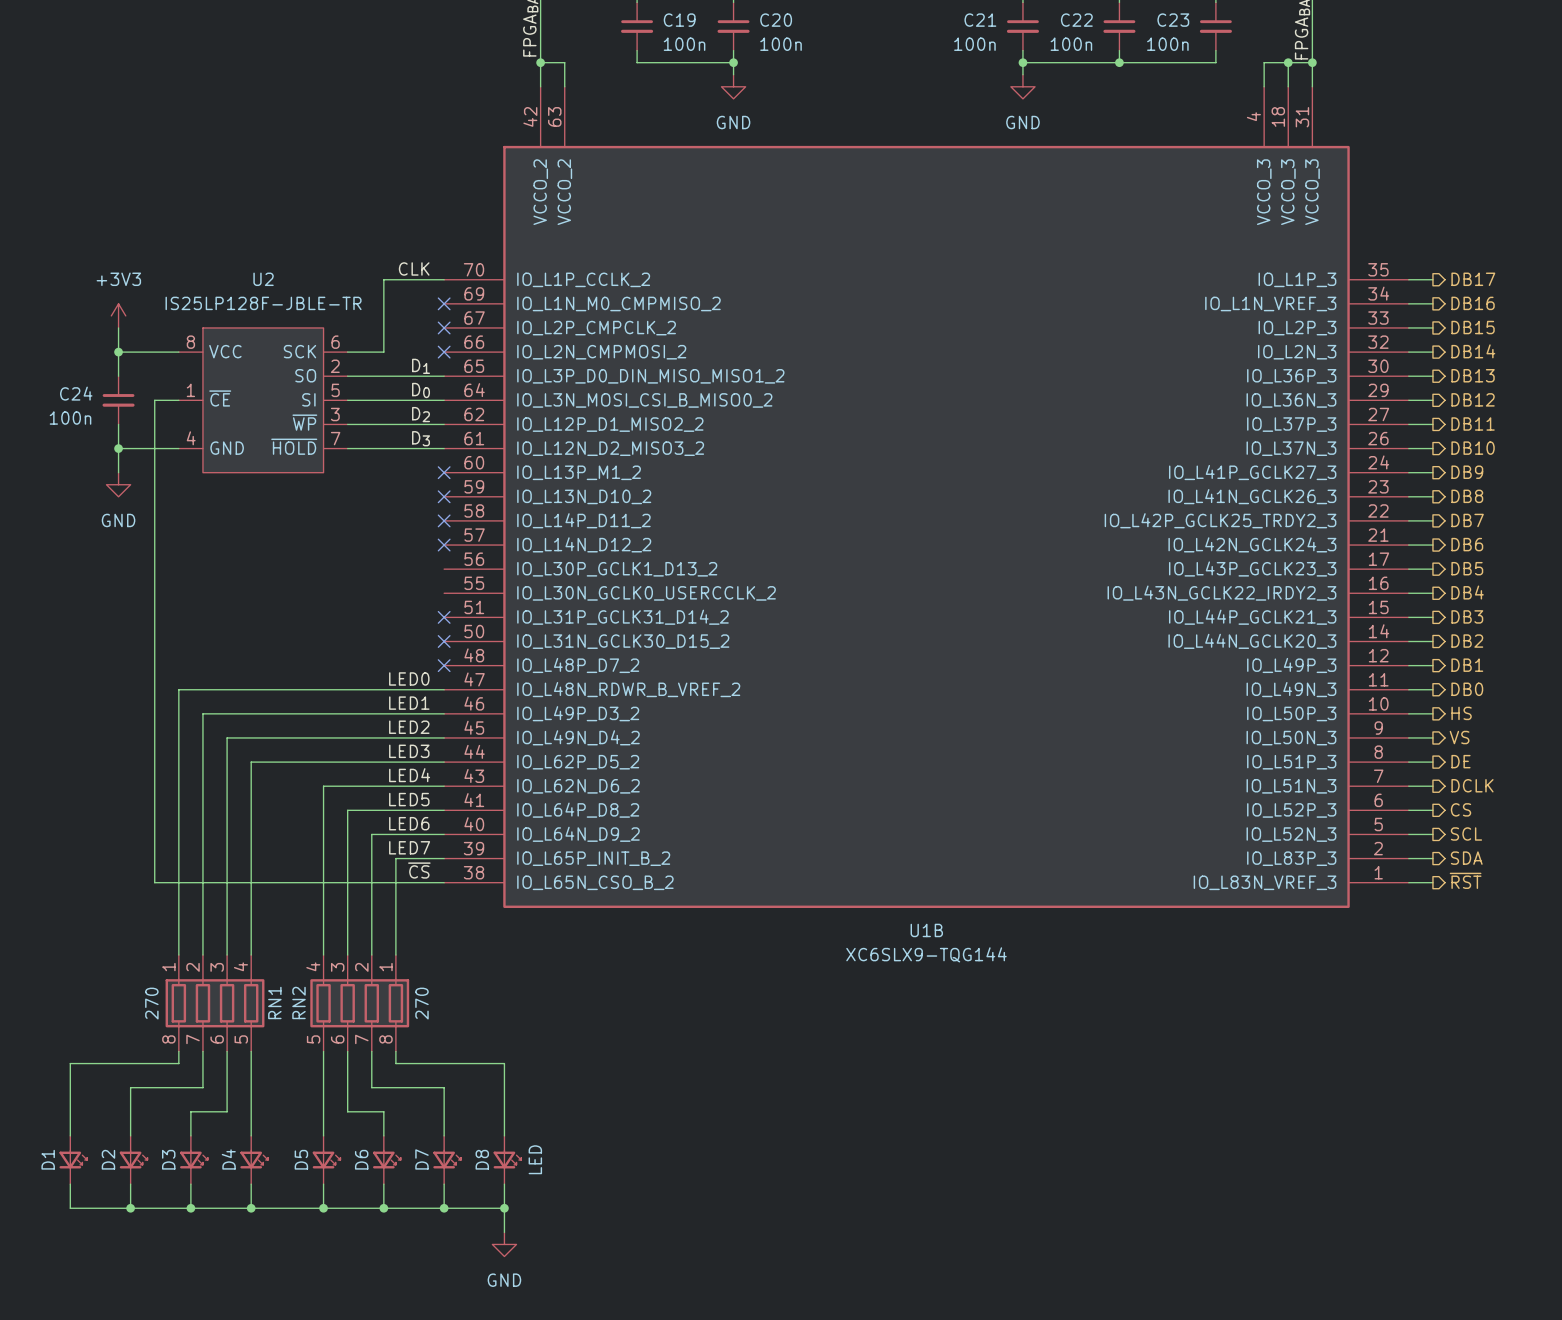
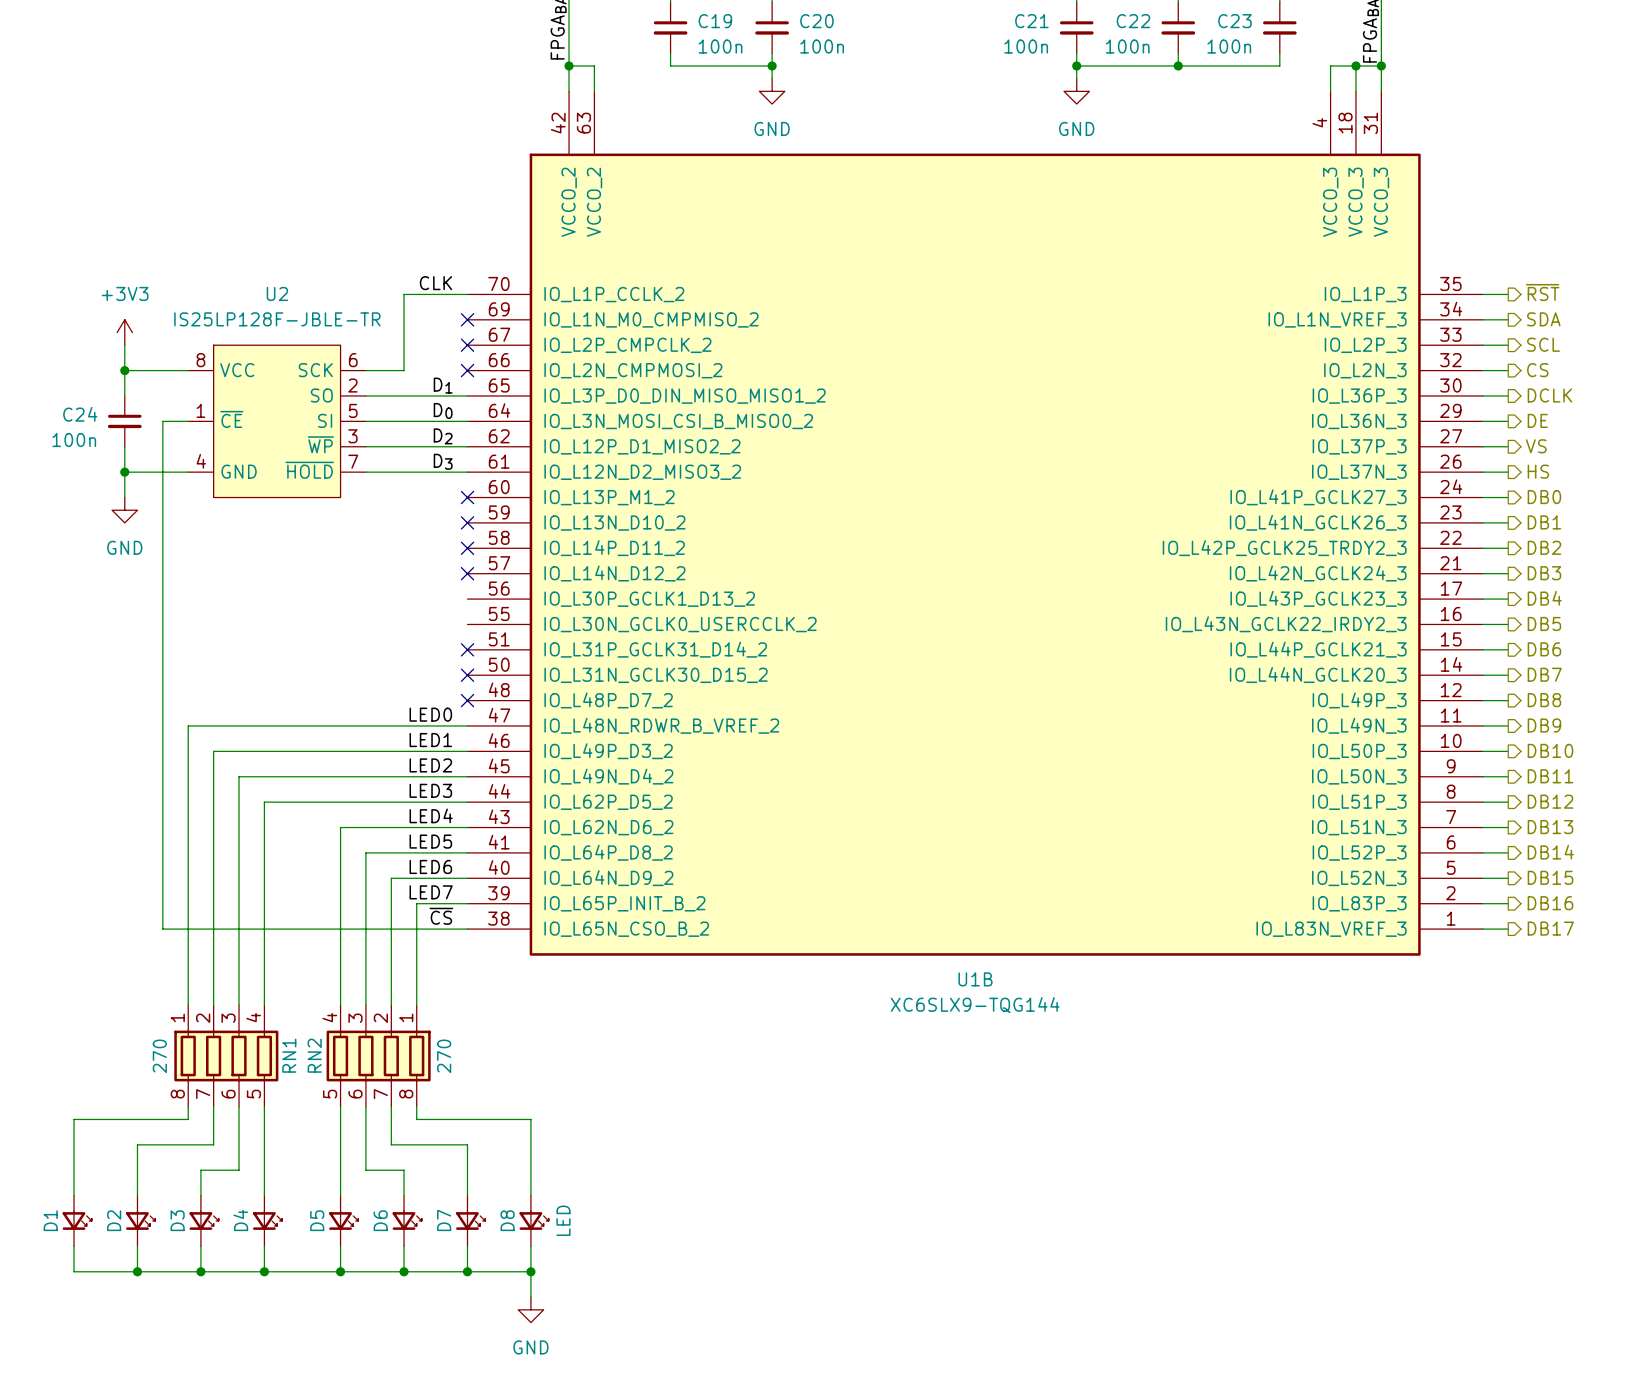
hierarchical label: DB17 (1473, 279) -> ~{RST} (1542, 292)
hierarchical label: DB16 (1473, 303) -> SDA (1543, 319)
hierarchical label: DB15 (1473, 327) -> SCL (1543, 344)
hierarchical label: DB14 (1473, 351) -> CS (1537, 370)
hierarchical label: DB13 (1473, 375) -> DCLK (1549, 395)
hierarchical label: DB12 (1473, 399) -> DE (1537, 420)
hierarchical label: DB11 (1473, 423) -> VS (1536, 446)
hierarchical label: DB10 (1473, 448) -> HS (1538, 471)
hierarchical label: DB9 (1467, 472) -> DB0 (1544, 497)
hierarchical label: DB8 (1467, 496) -> DB1 (1544, 522)
hierarchical label: DB7 (1467, 520) -> DB2 (1544, 547)
hierarchical label: DB6 (1467, 544) -> DB3 (1544, 573)
hierarchical label: DB5 (1467, 568) -> DB4 (1544, 598)
hierarchical label: DB4 (1467, 592) -> DB5 (1544, 623)
hierarchical label: DB3 (1467, 616) -> DB6 (1544, 649)
hierarchical label: DB2 (1467, 641) -> DB7 (1544, 674)
hierarchical label: DB1 (1467, 665) -> DB8 (1544, 700)
hierarchical label: DB0 (1467, 689) -> DB9 (1544, 725)
hierarchical label: HS (1461, 713) -> DB10 (1550, 750)
hierarchical label: VS (1459, 737) -> DB11 (1550, 776)
hierarchical label: DE (1461, 761) -> DB12 (1550, 801)
hierarchical label: DCLK (1472, 785) -> DB13 (1550, 827)
hierarchical label: CS (1461, 809) -> DB14 (1550, 852)
hierarchical label: SCL (1466, 833) -> DB15 (1550, 877)
hierarchical label: SDA (1466, 858) -> DB16 (1550, 903)
hierarchical label: ~{RST} (1465, 880) -> DB17 (1550, 928)

